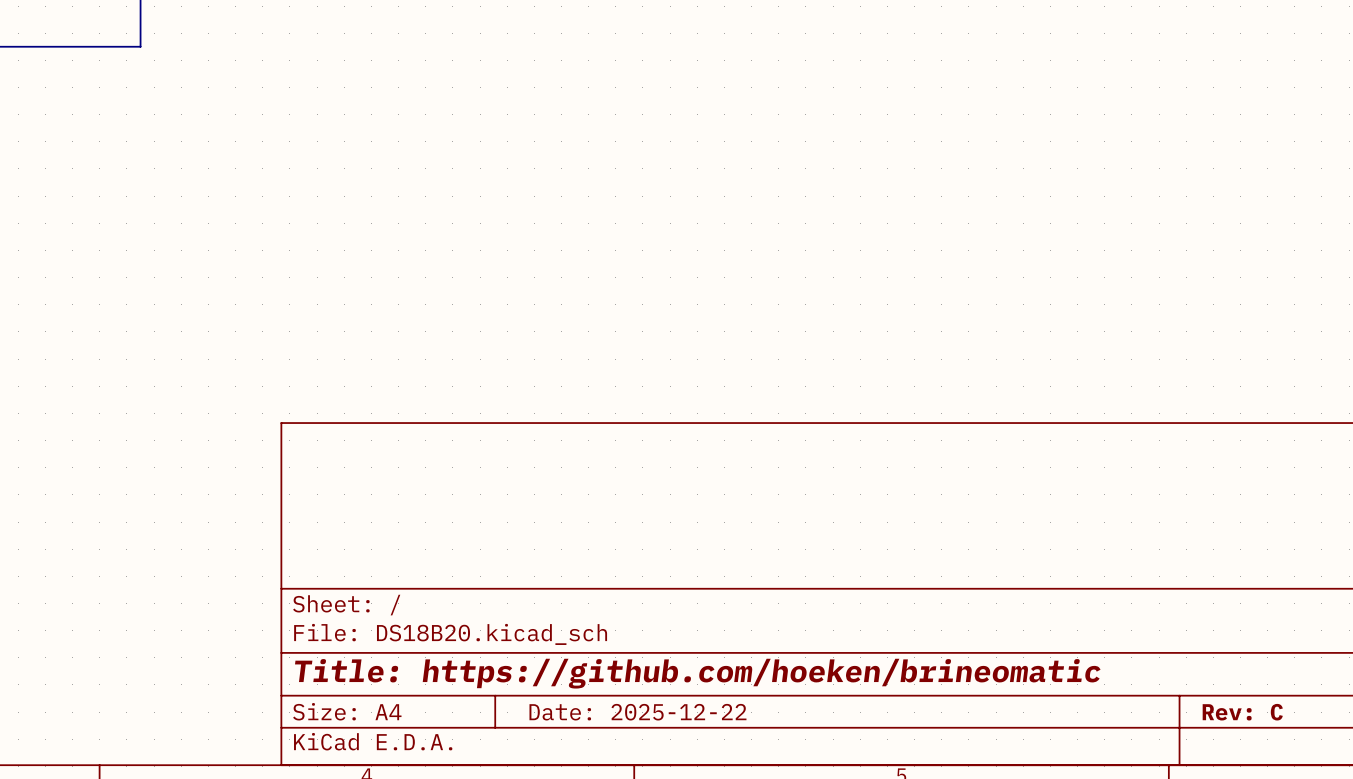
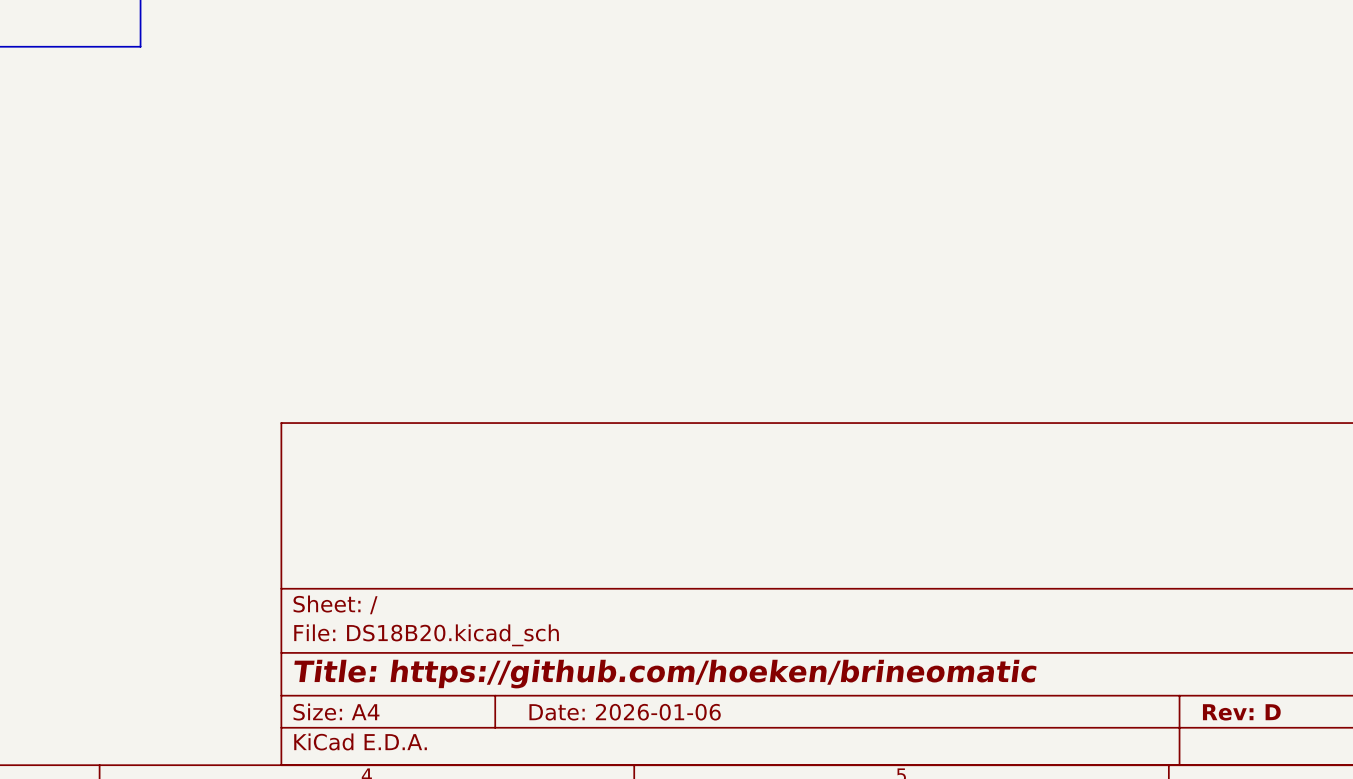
title block: Date: 2025-12-22 (637, 712) -> Date: 2026-01-06 (625, 712)
title block: Rev: C (1242, 712) -> Rev: D (1241, 712)

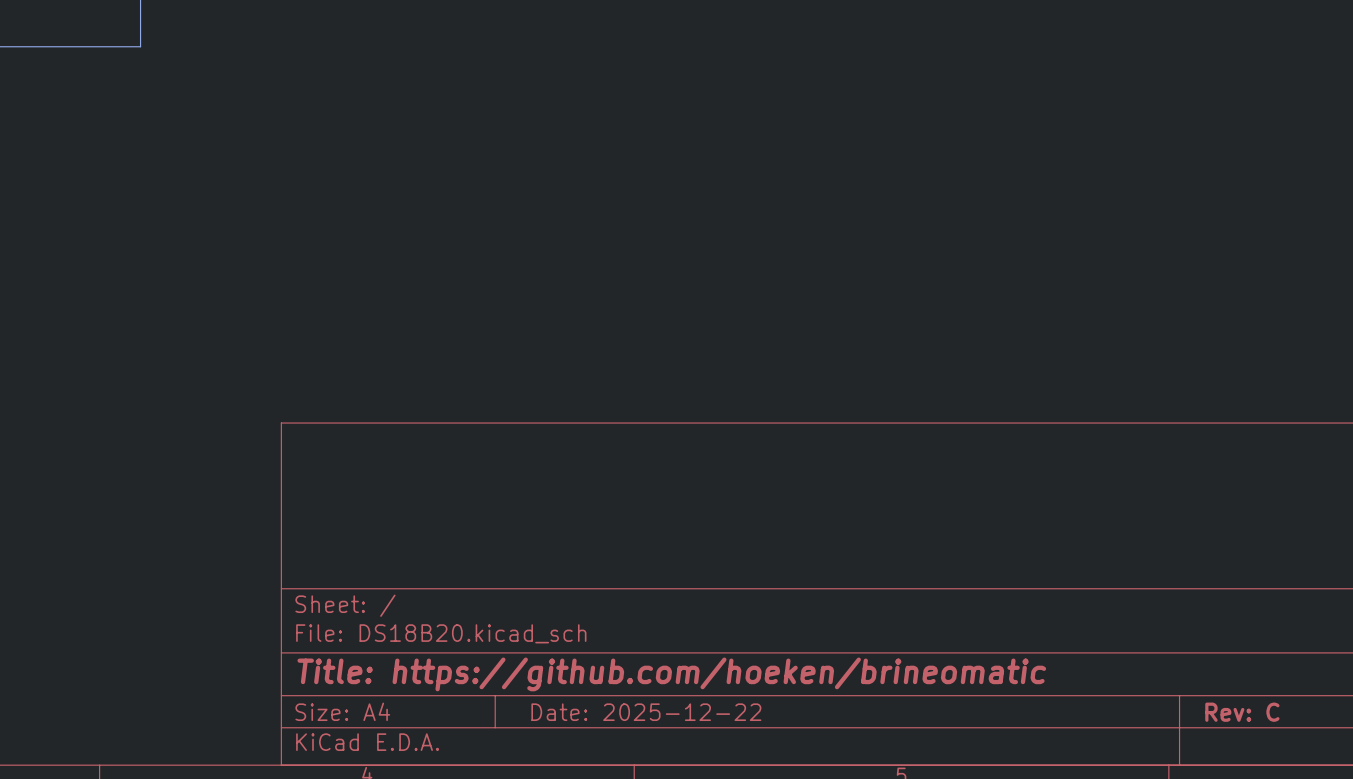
title block: Date: 2026-01-06 (625, 712) -> Date: 2025-12-22 (646, 712)
title block: Rev: D (1241, 712) -> Rev: C (1242, 712)

